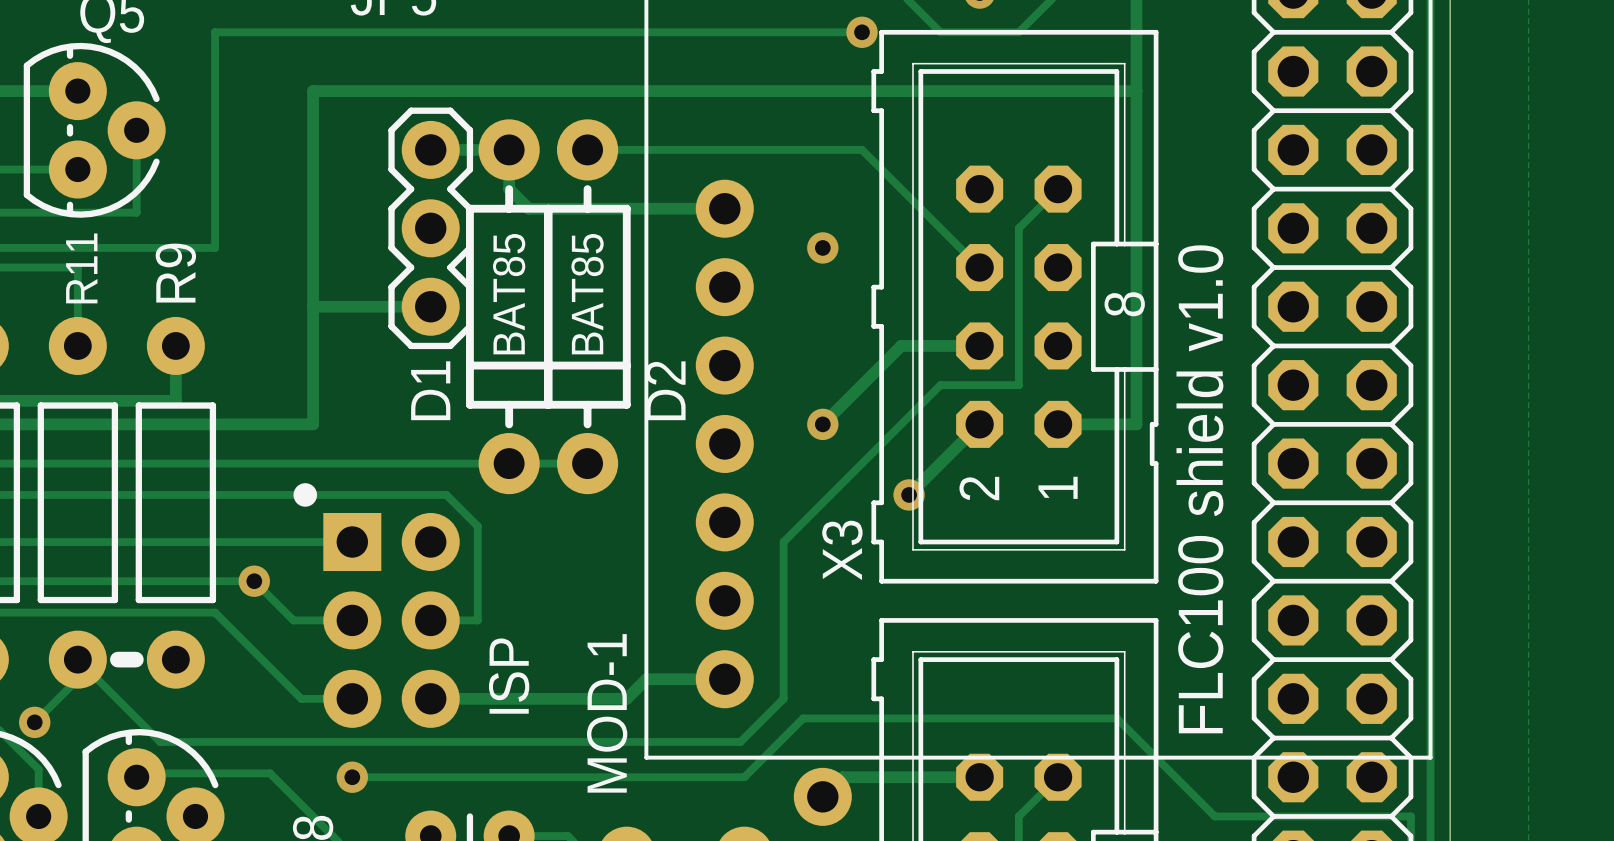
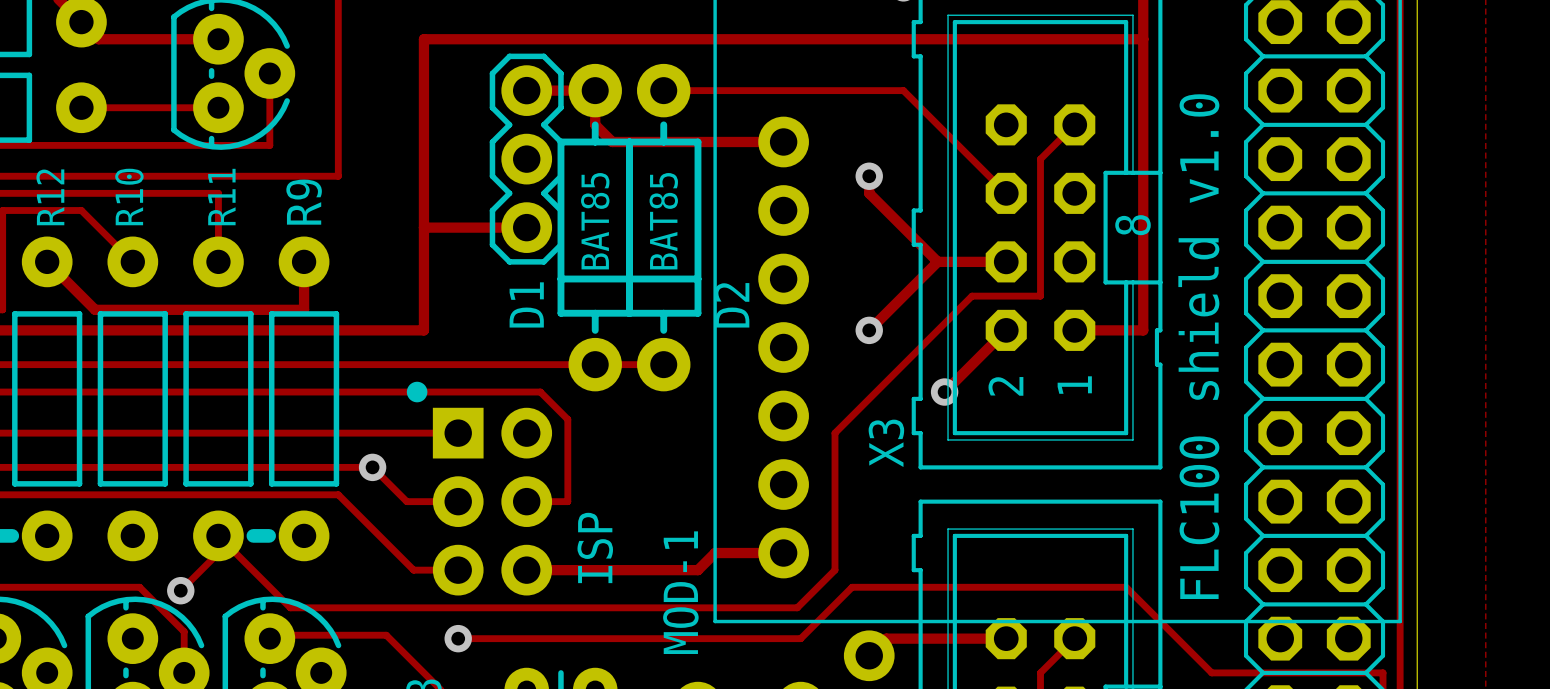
track: none -> (869, 176) (869, 193) (937, 261)

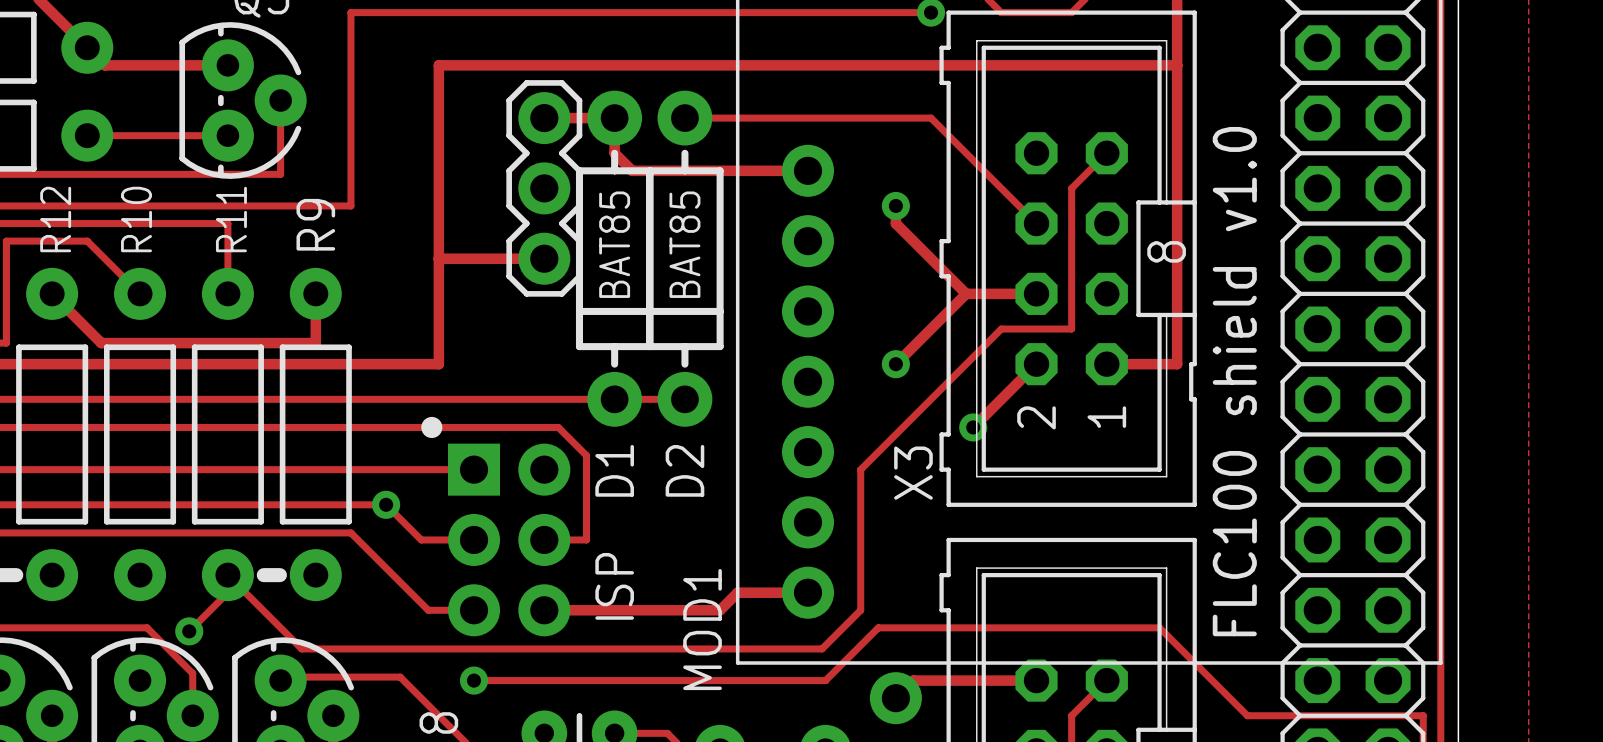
D1 name position: D1 (526, 304) -> D1 (614, 470)
D2 name position: D2 (731, 305) -> D2 (684, 470)
MOD-1 name: MOD-1 (680, 592) -> MOD1 (702, 629)

